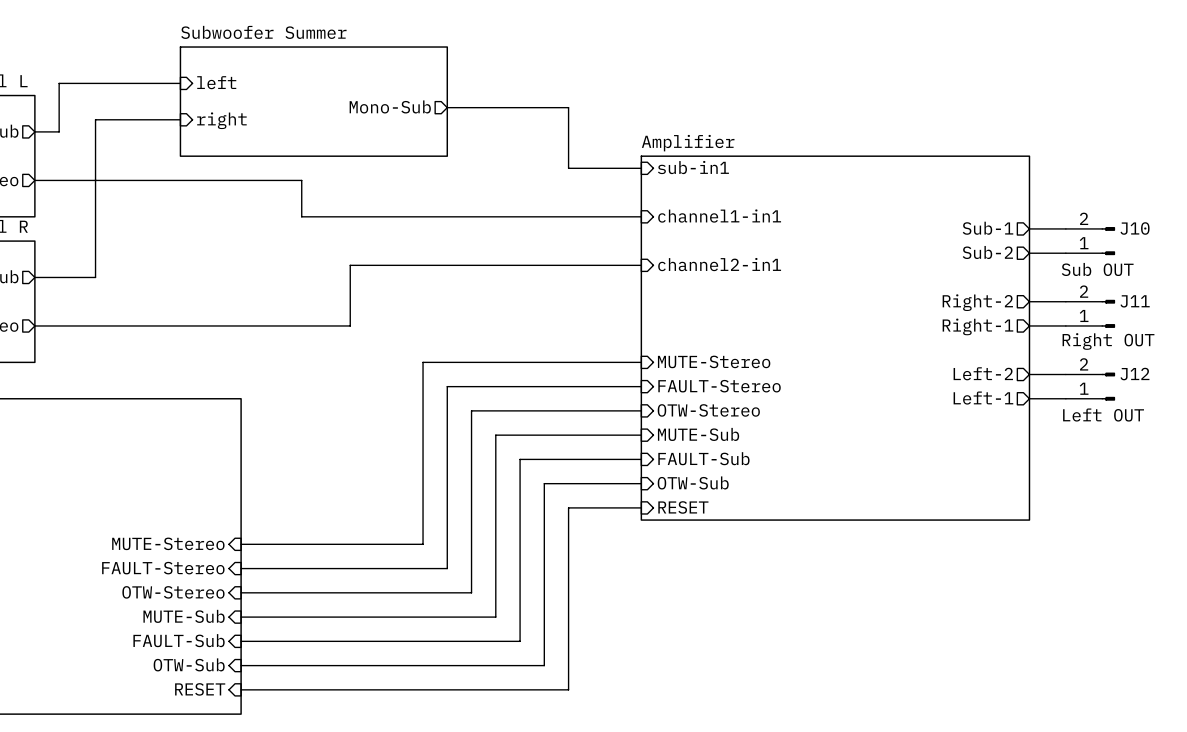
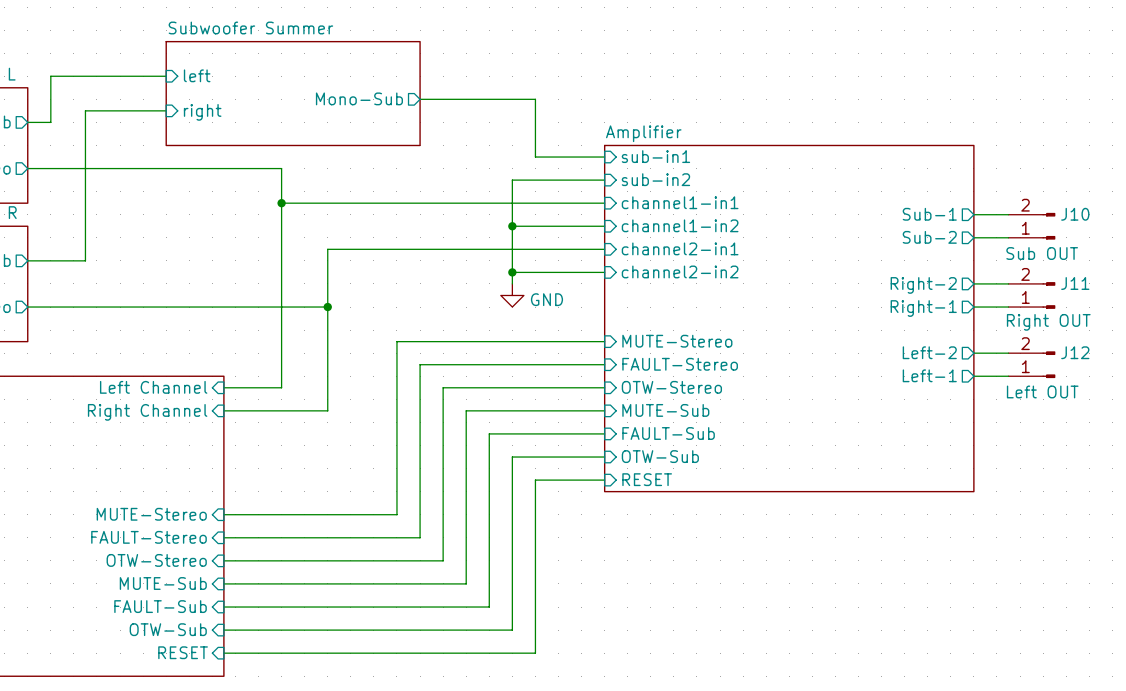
sheet pin: none -> sub-in2 (655, 179)
wire: none -> (604, 180) (512, 180) (512, 283)
wire: none -> (281, 203) (281, 387) (223, 387)
junction: none -> (281, 203)
sheet pin: none -> channel1-in2 (680, 225)
wire: none -> (512, 226) (604, 226)
junction: none -> (512, 226)
sheet pin: none -> channel2-in2 (680, 271)
wire: none -> (512, 272) (604, 272)
junction: none -> (512, 272)
power symbol: none -> GND (512, 295)
wire: none -> (327, 307) (327, 410) (223, 410)
junction: none -> (327, 307)
sheet pin: none -> Left Channel (153, 387)
sheet pin: none -> Right Channel (147, 412)

